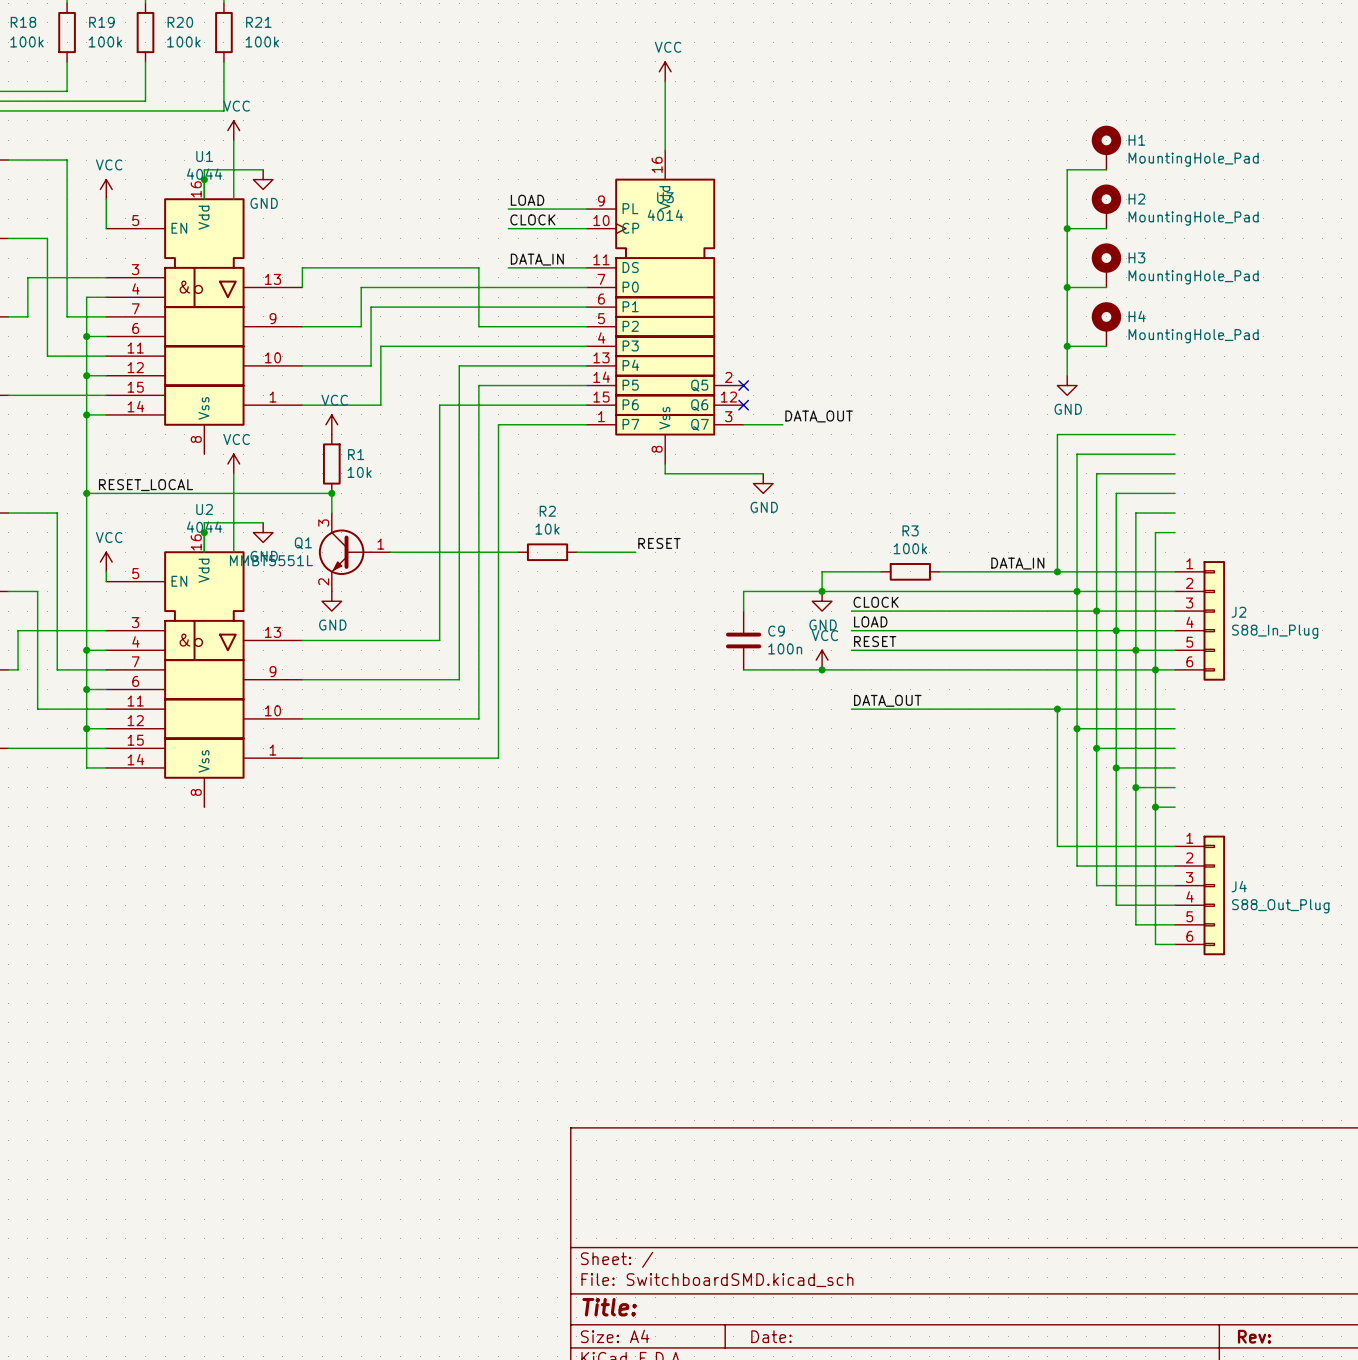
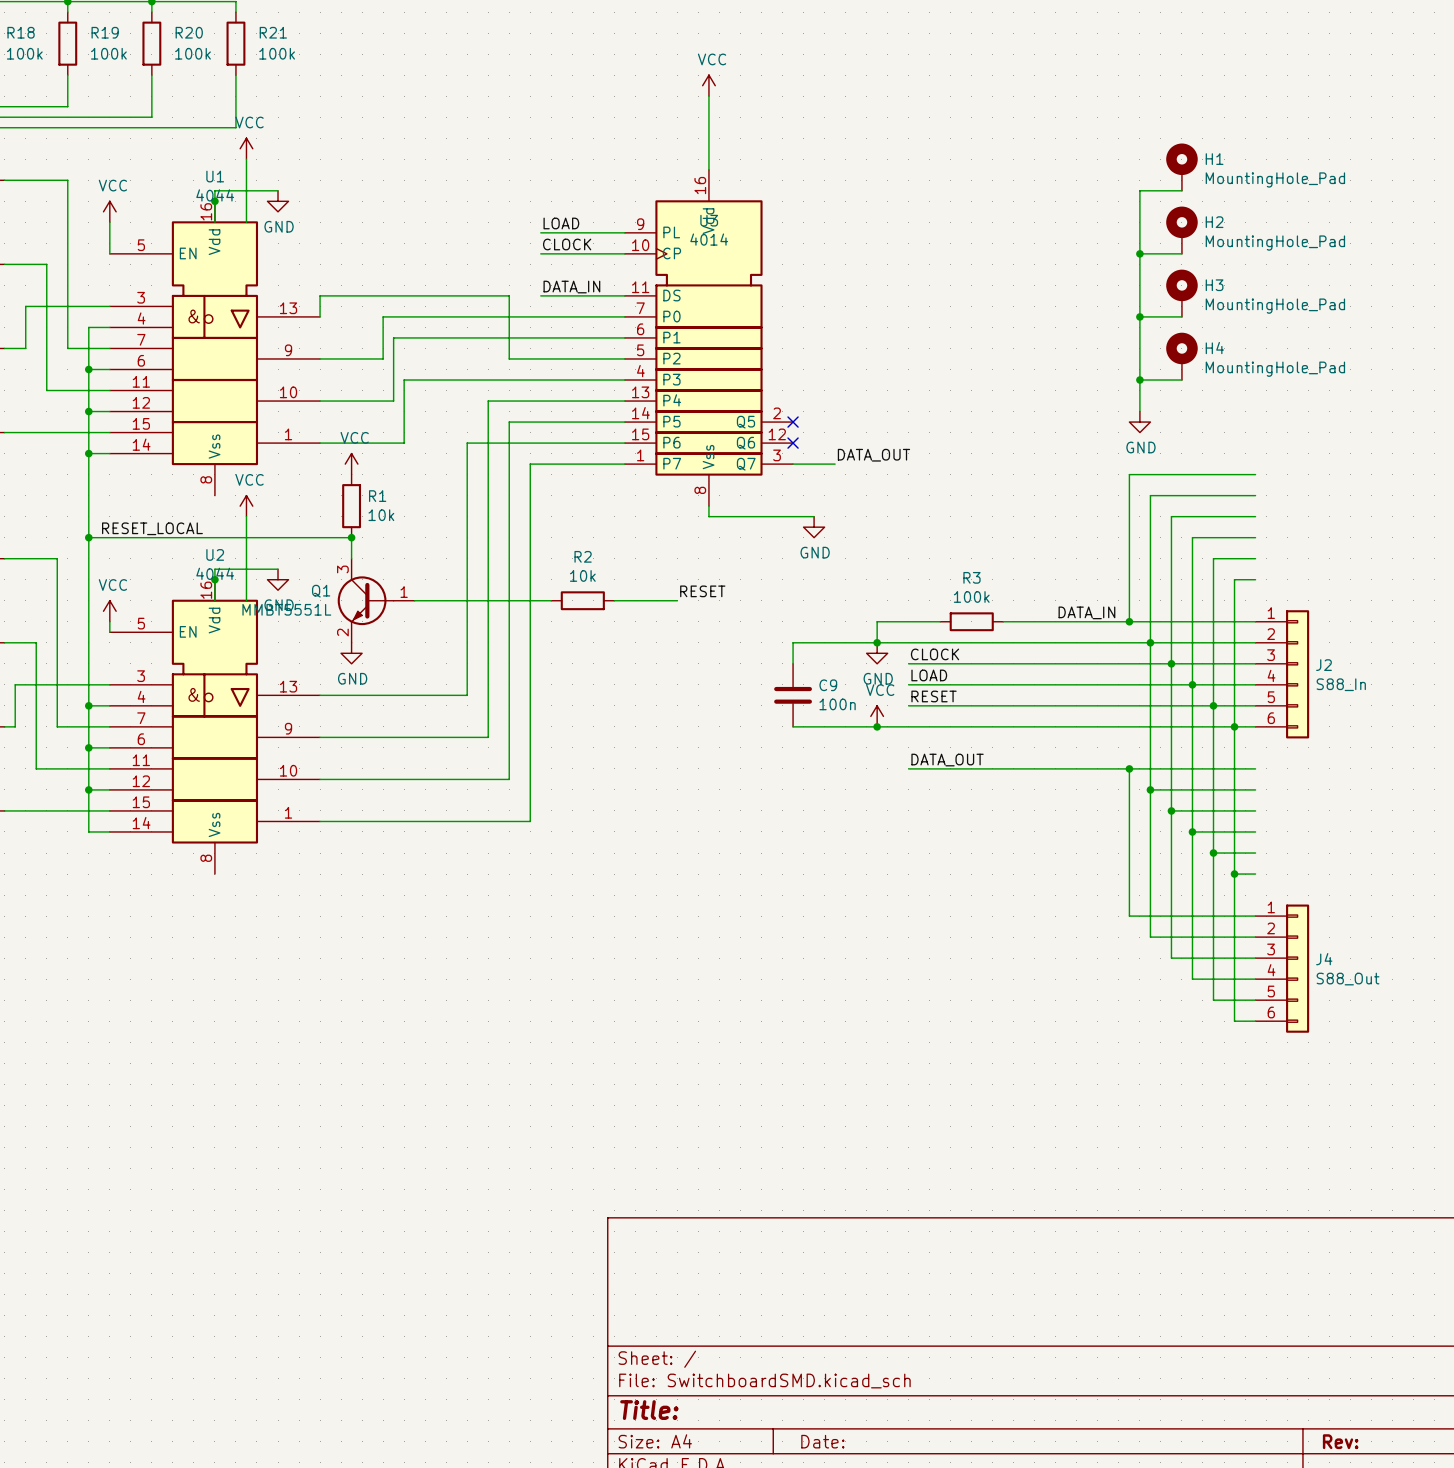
J2 value: S88_In_Plug (1275, 631) -> S88_In (1341, 684)
J4 value: S88_Out_Plug (1280, 906) -> S88_Out (1348, 979)

